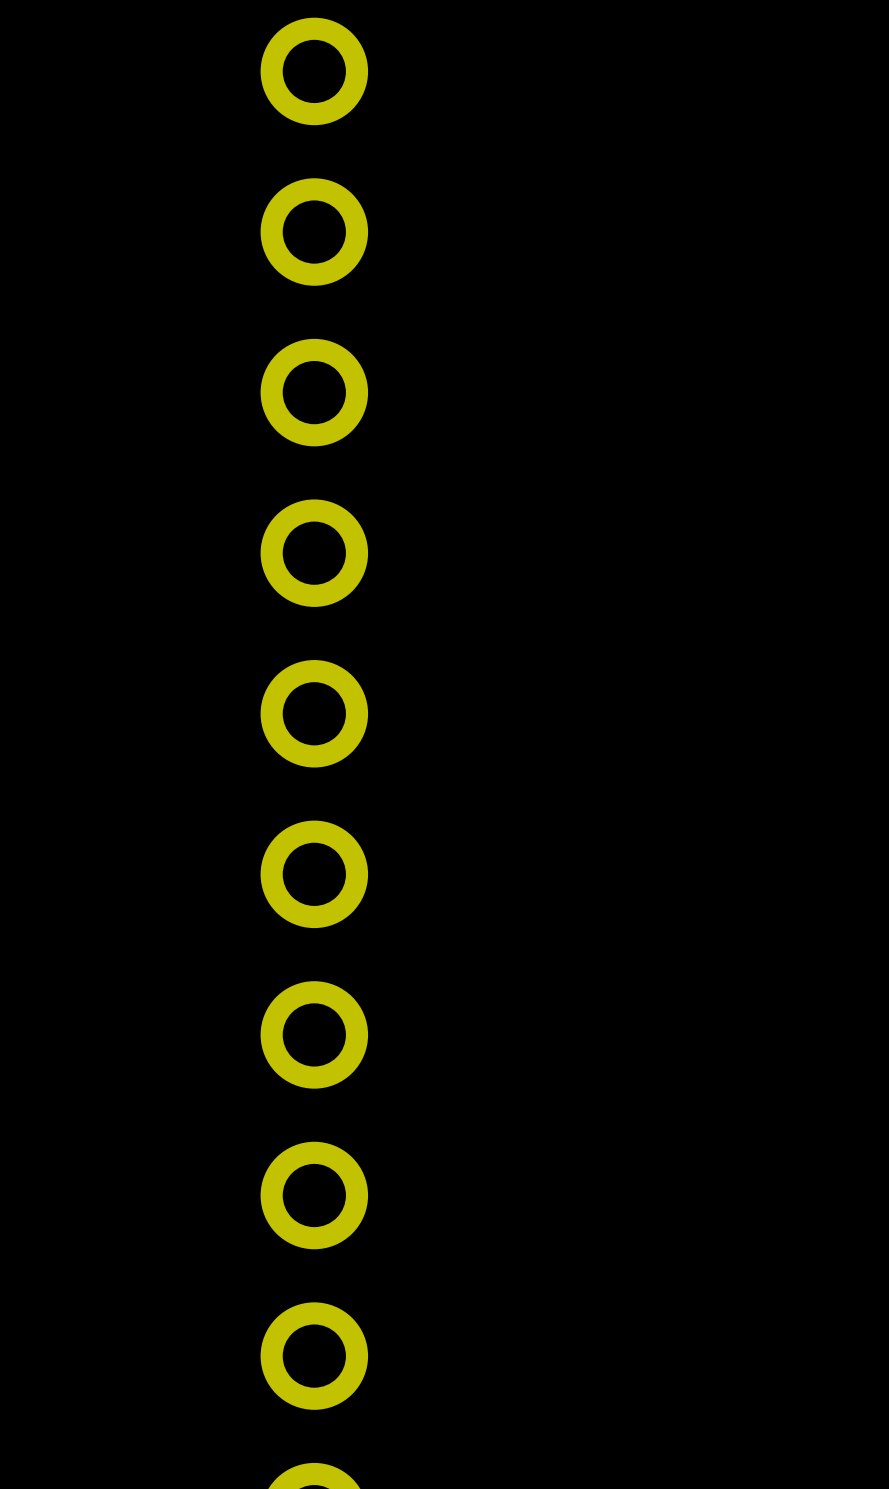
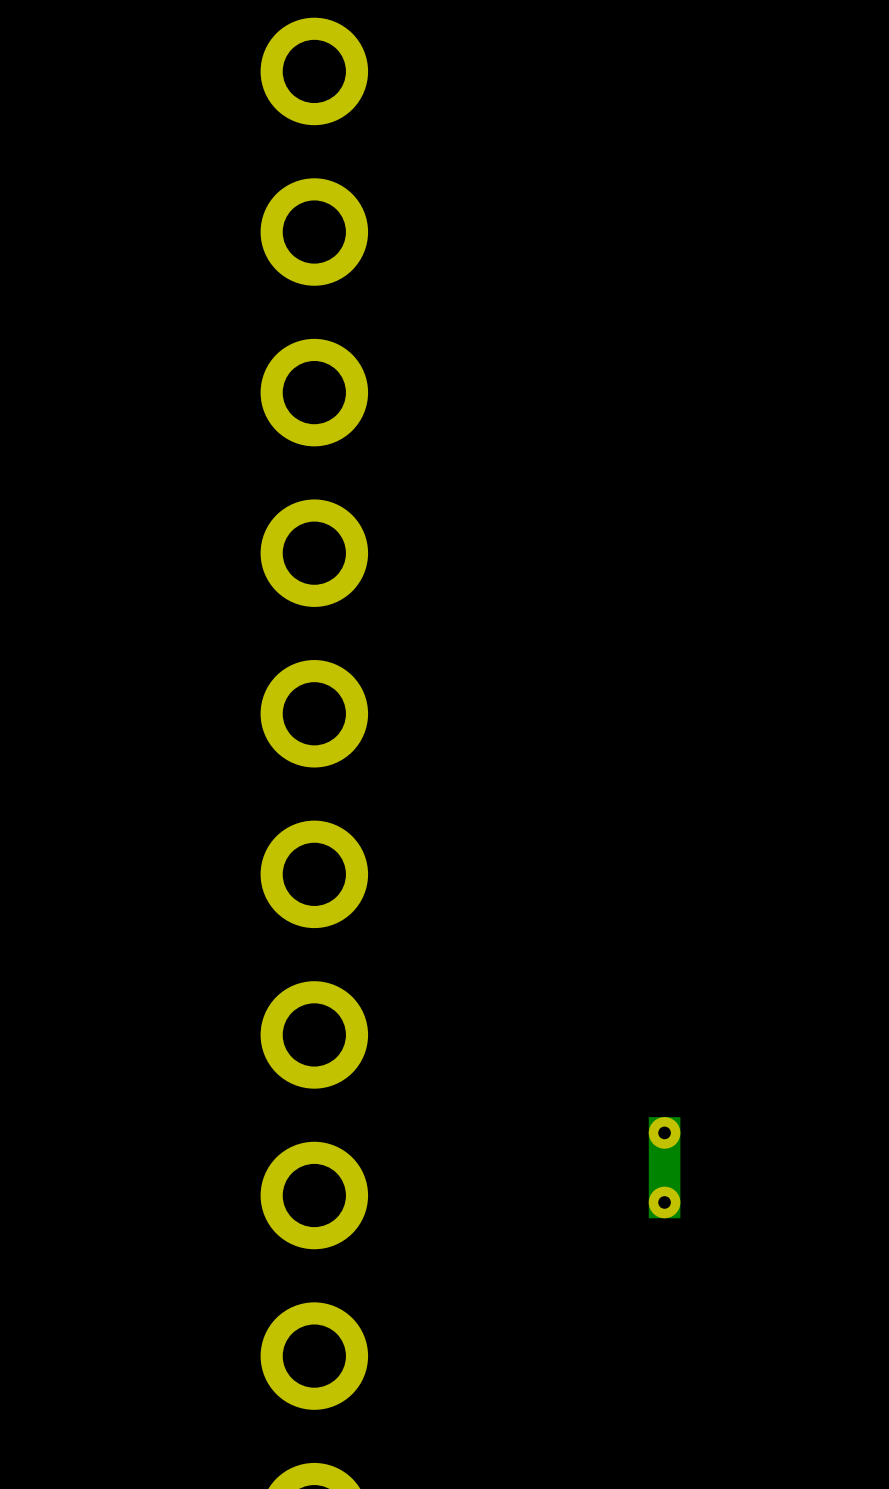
part: none -> (664, 1167)

